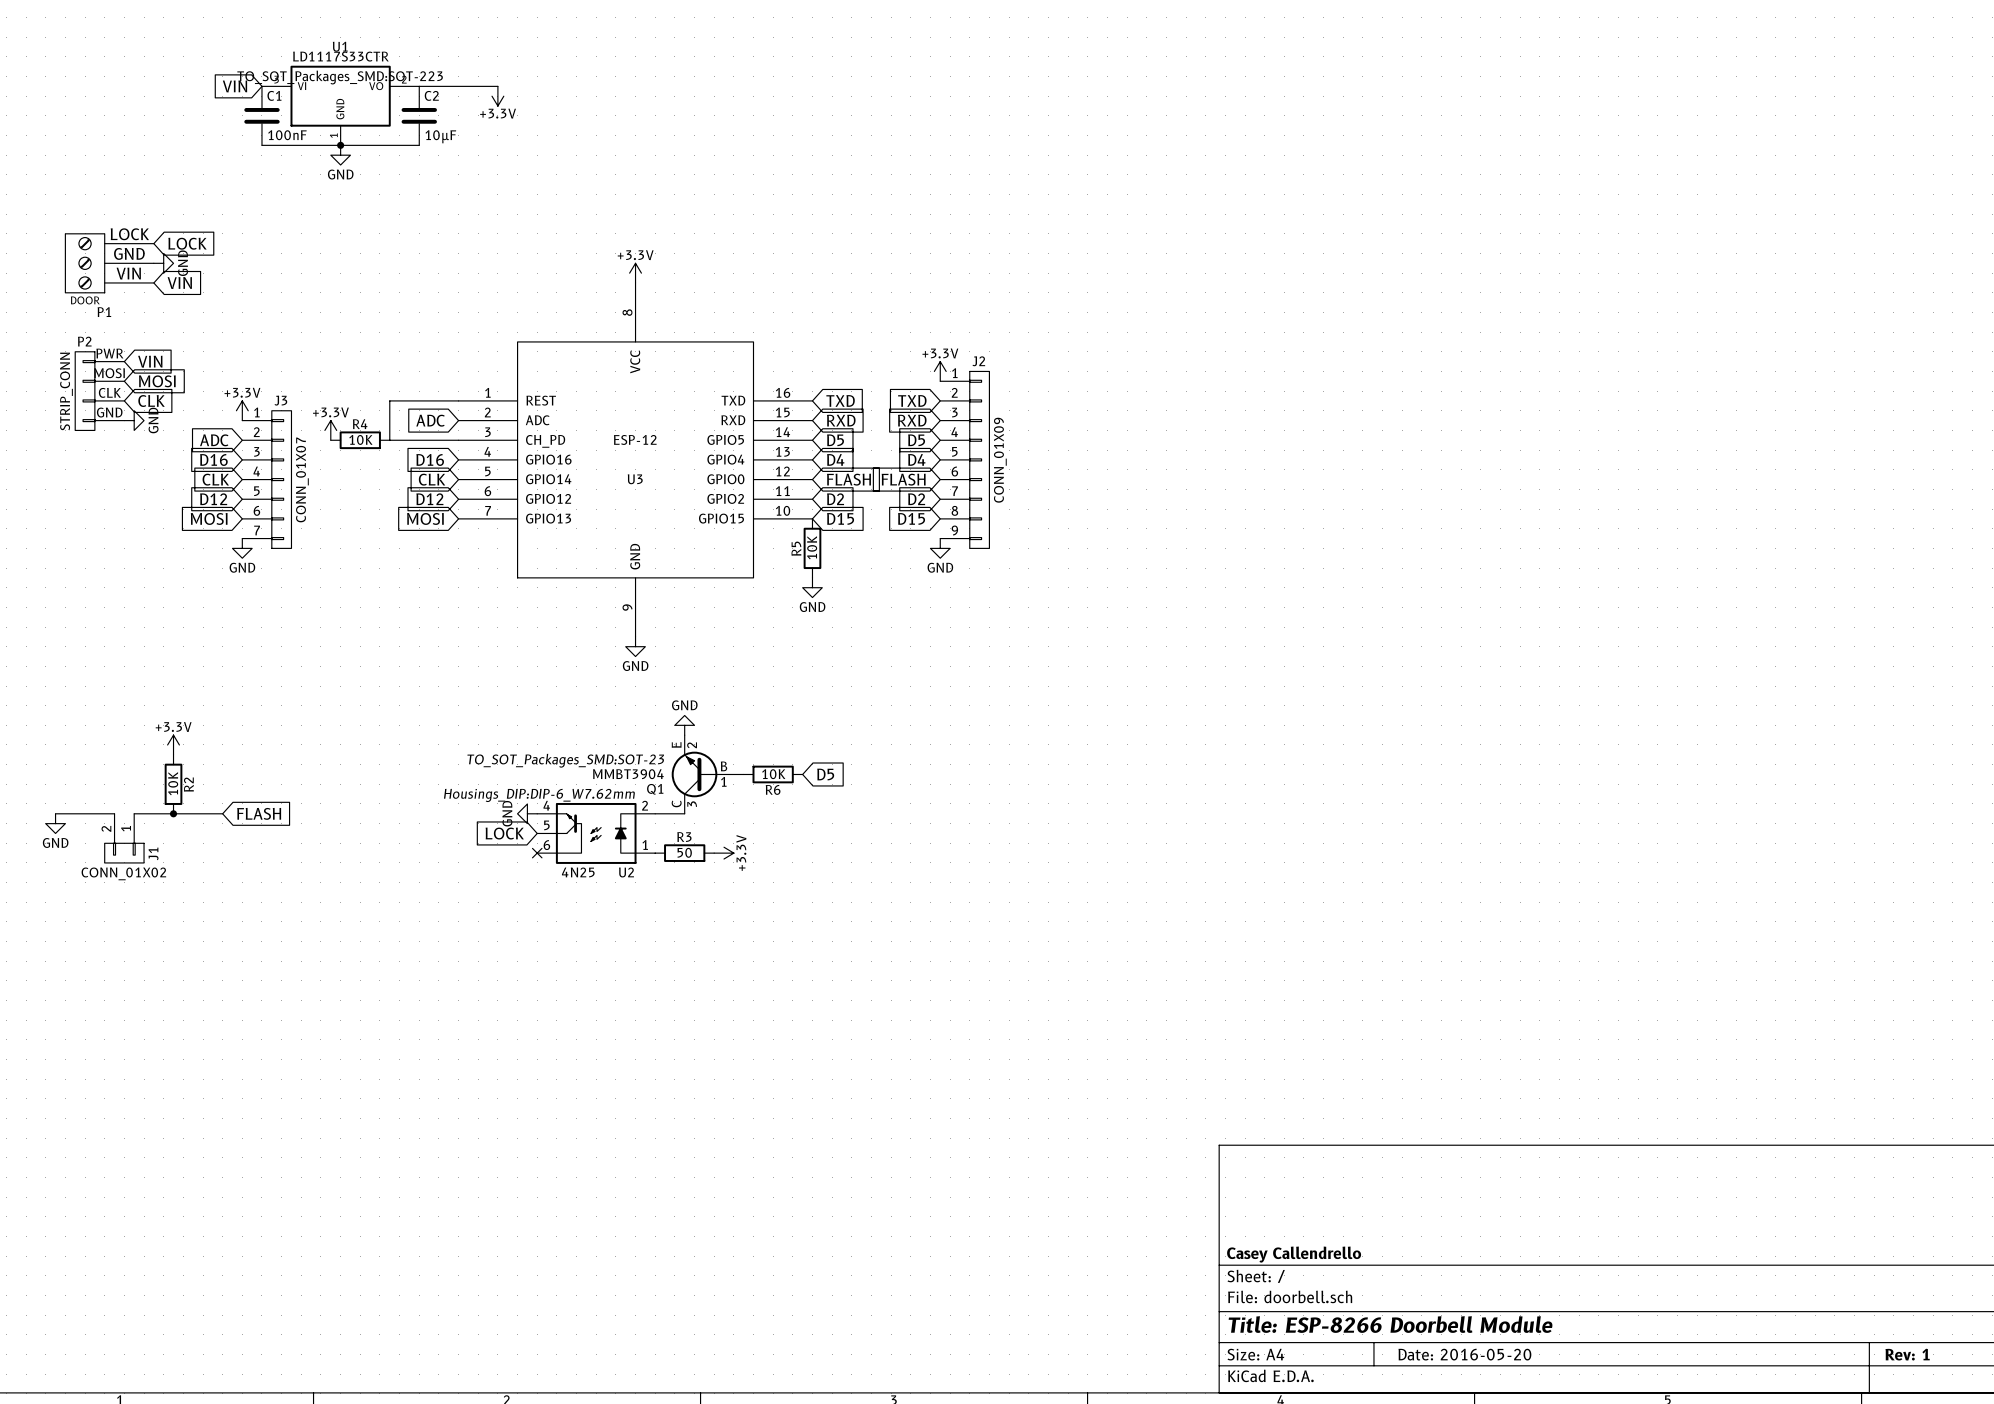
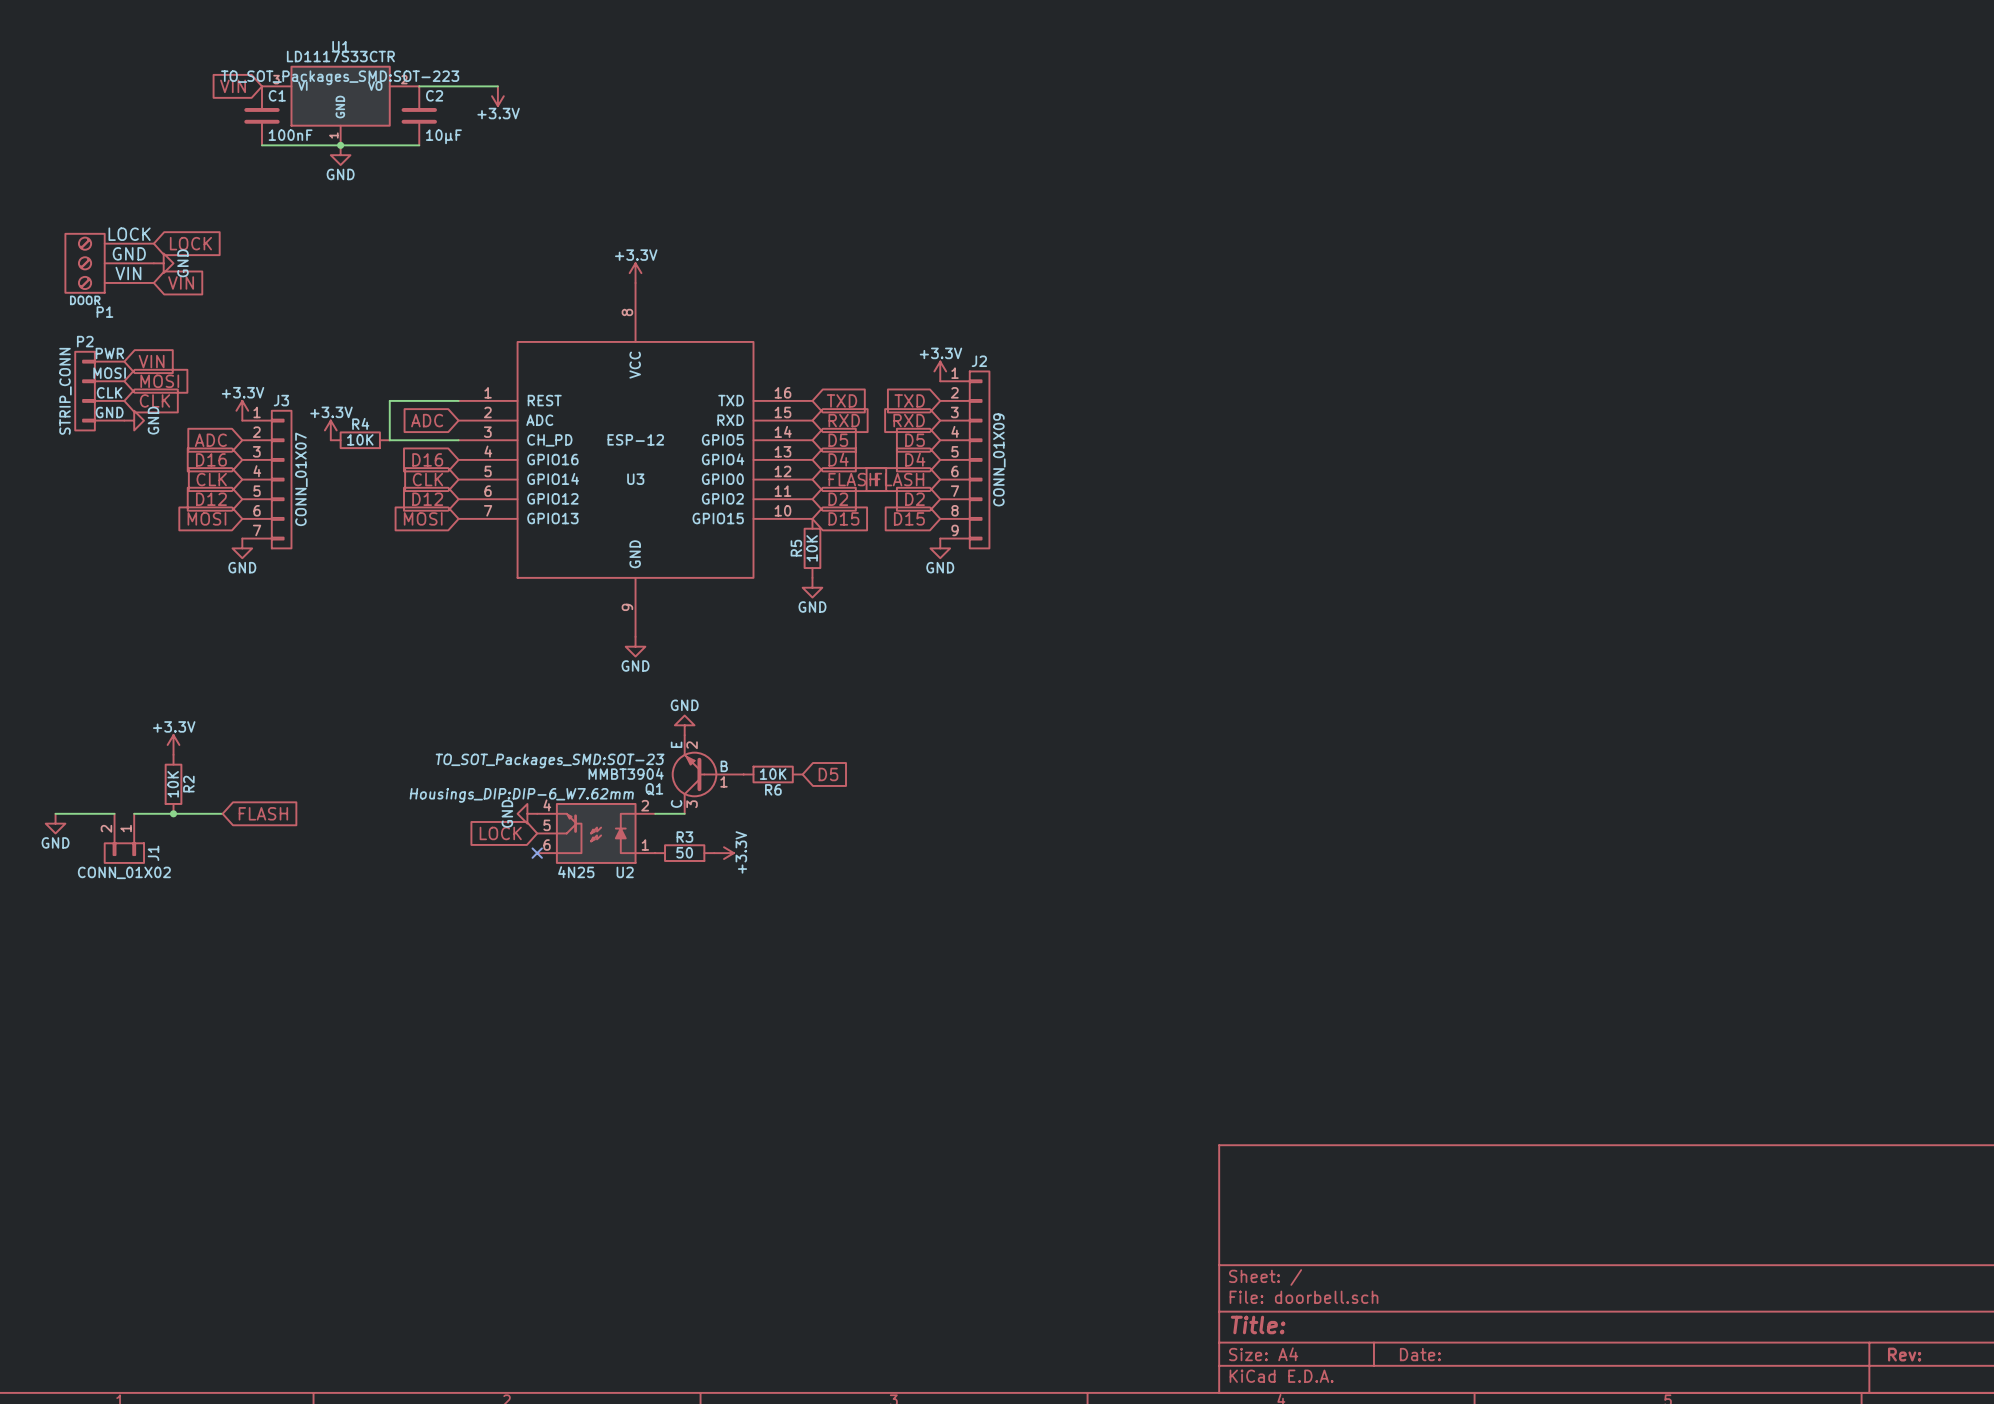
title block: Casey Callendrello (1294, 1254) -> none
title block: Title: ESP-8266 Doorbell Module (1390, 1324) -> Title: (1258, 1324)
title block: Date: 2016-05-20 (1464, 1354) -> Date: (1420, 1354)
title block: Rev: 1 (1907, 1354) -> Rev: (1904, 1354)

